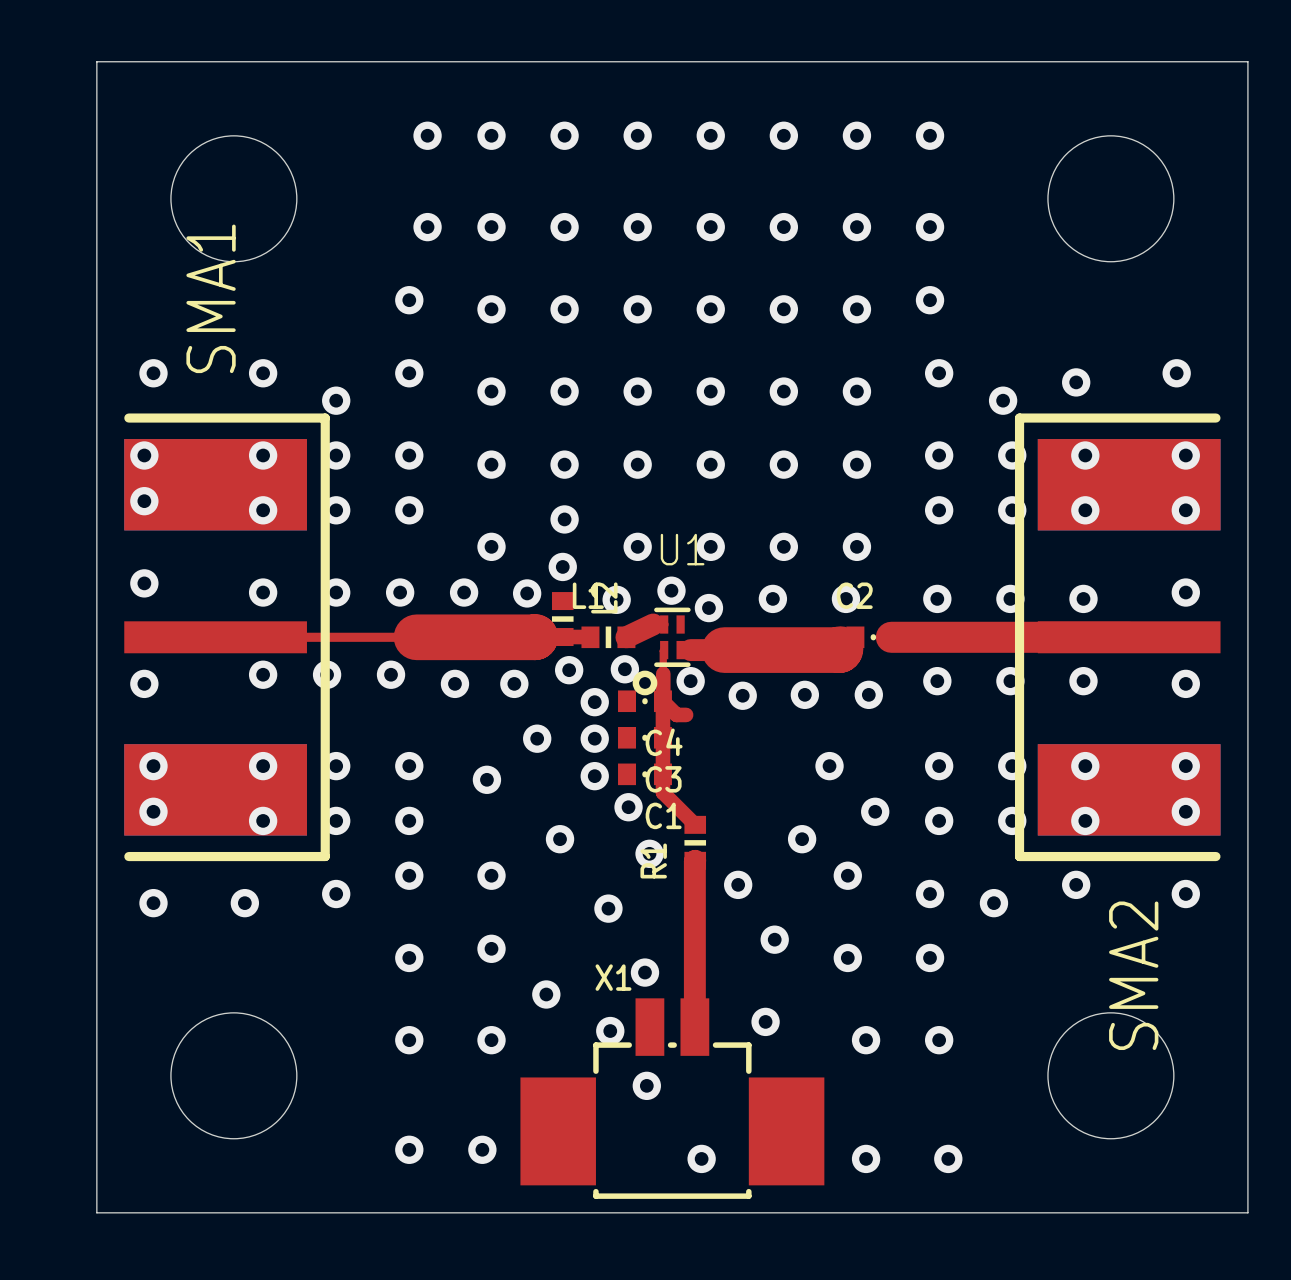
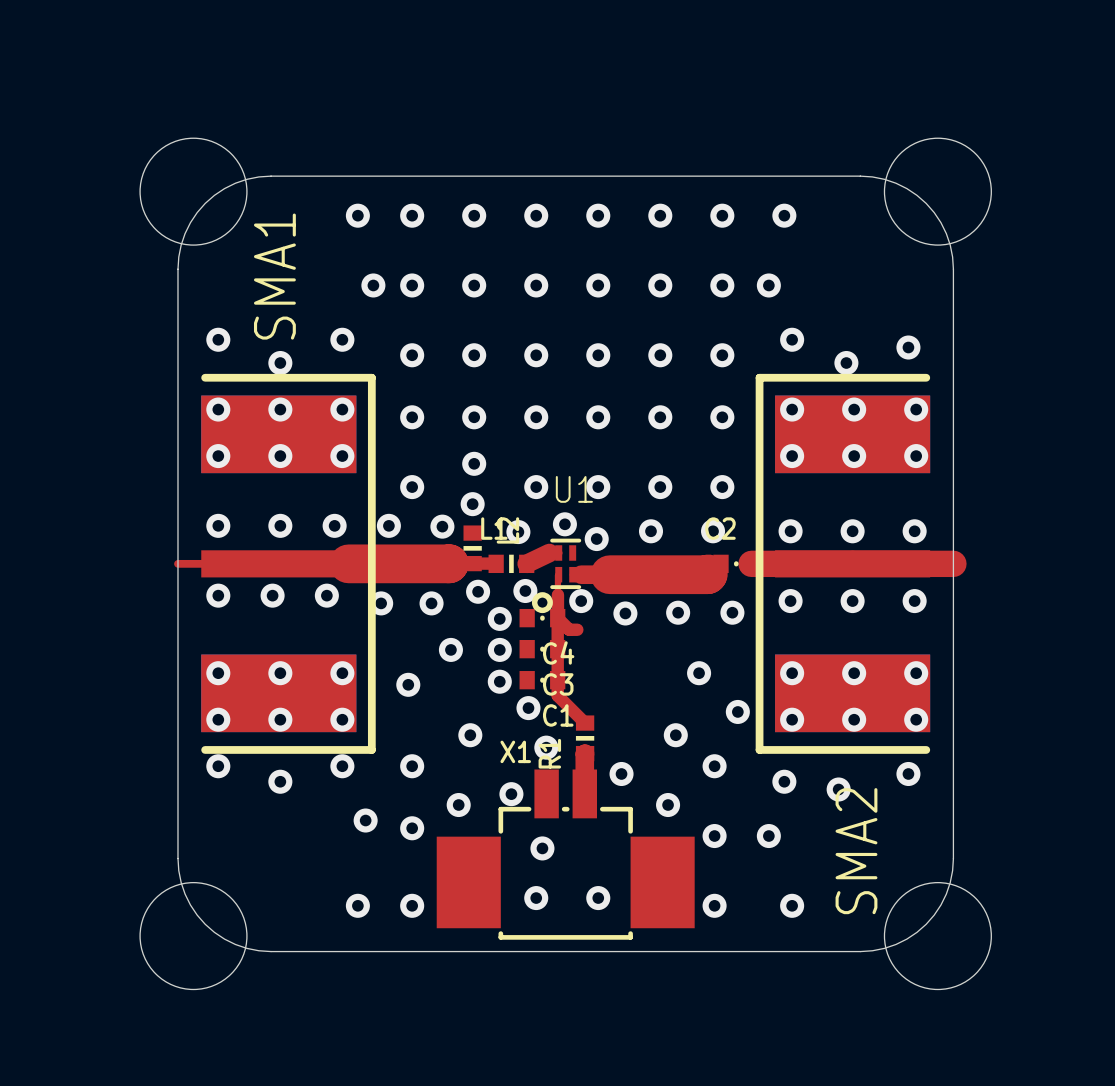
board edge: (96, 61) (96, 1212) (1247, 1212) (1247, 61) (96, 61) -> (271, 176) (258, 176) (235, 183) (224, 188) (205, 203) (190, 222) (185, 233) (178, 257) (177, 858) (178, 870) (185, 894) (197, 915) (214, 932) (235, 944) (258, 950) (271, 951) (860, 951) (872, 950) (895, 944) (917, 932) (934, 915) (946, 894) (952, 870) (953, 858) (953, 269) (952, 257) (946, 233) (934, 212) (917, 195) (895, 183) (872, 176) (860, 176) (271, 176)
via: (427, 135) -> none
via: (491, 135) -> none
via: (564, 135) -> none
via: (637, 135) -> none
via: (710, 135) -> none
via: (783, 135) -> none
via: (856, 135) -> none
via: (930, 135) -> none
via position: (409, 300) -> (373, 285)
via position: (930, 300) -> (768, 285)
via: (153, 373) -> none
via: (1176, 373) -> none
via: (144, 455) -> none
via: (1185, 455) -> none
via: (144, 501) -> none
via: (1185, 510) -> none
via: (144, 583) -> none
via: (1185, 592) -> none
SMA1 position: (227, 637) -> (288, 563)
SMA2 position: (1117, 637) -> (842, 563)
via: (144, 683) -> none
via: (1185, 683) -> none
via: (153, 766) -> none
via: (1185, 766) -> none
via: (153, 811) -> none
via: (1185, 811) -> none
via: (1185, 894) -> none
via: (153, 903) -> none
via position: (244, 903) -> (218, 766)
top track: (694, 908) (694, 1027) -> none
via: none -> (458, 805)
via position: (774, 939) -> (668, 805)
via position: (409, 957) -> (365, 820)
via position: (930, 957) -> (768, 836)
via: (546, 994) -> none
via: (765, 1021) -> none
via position: (610, 1031) -> (536, 898)
via: none -> (598, 898)
via position: (409, 1040) -> (357, 905)
via position: (866, 1040) -> (714, 905)
via: (646, 1085) -> none
X1 position: (672, 1098) -> (565, 854)
via: (409, 1149) -> none
via: (482, 1149) -> none
via: (701, 1158) -> none
via: (866, 1158) -> none
via: (948, 1158) -> none

